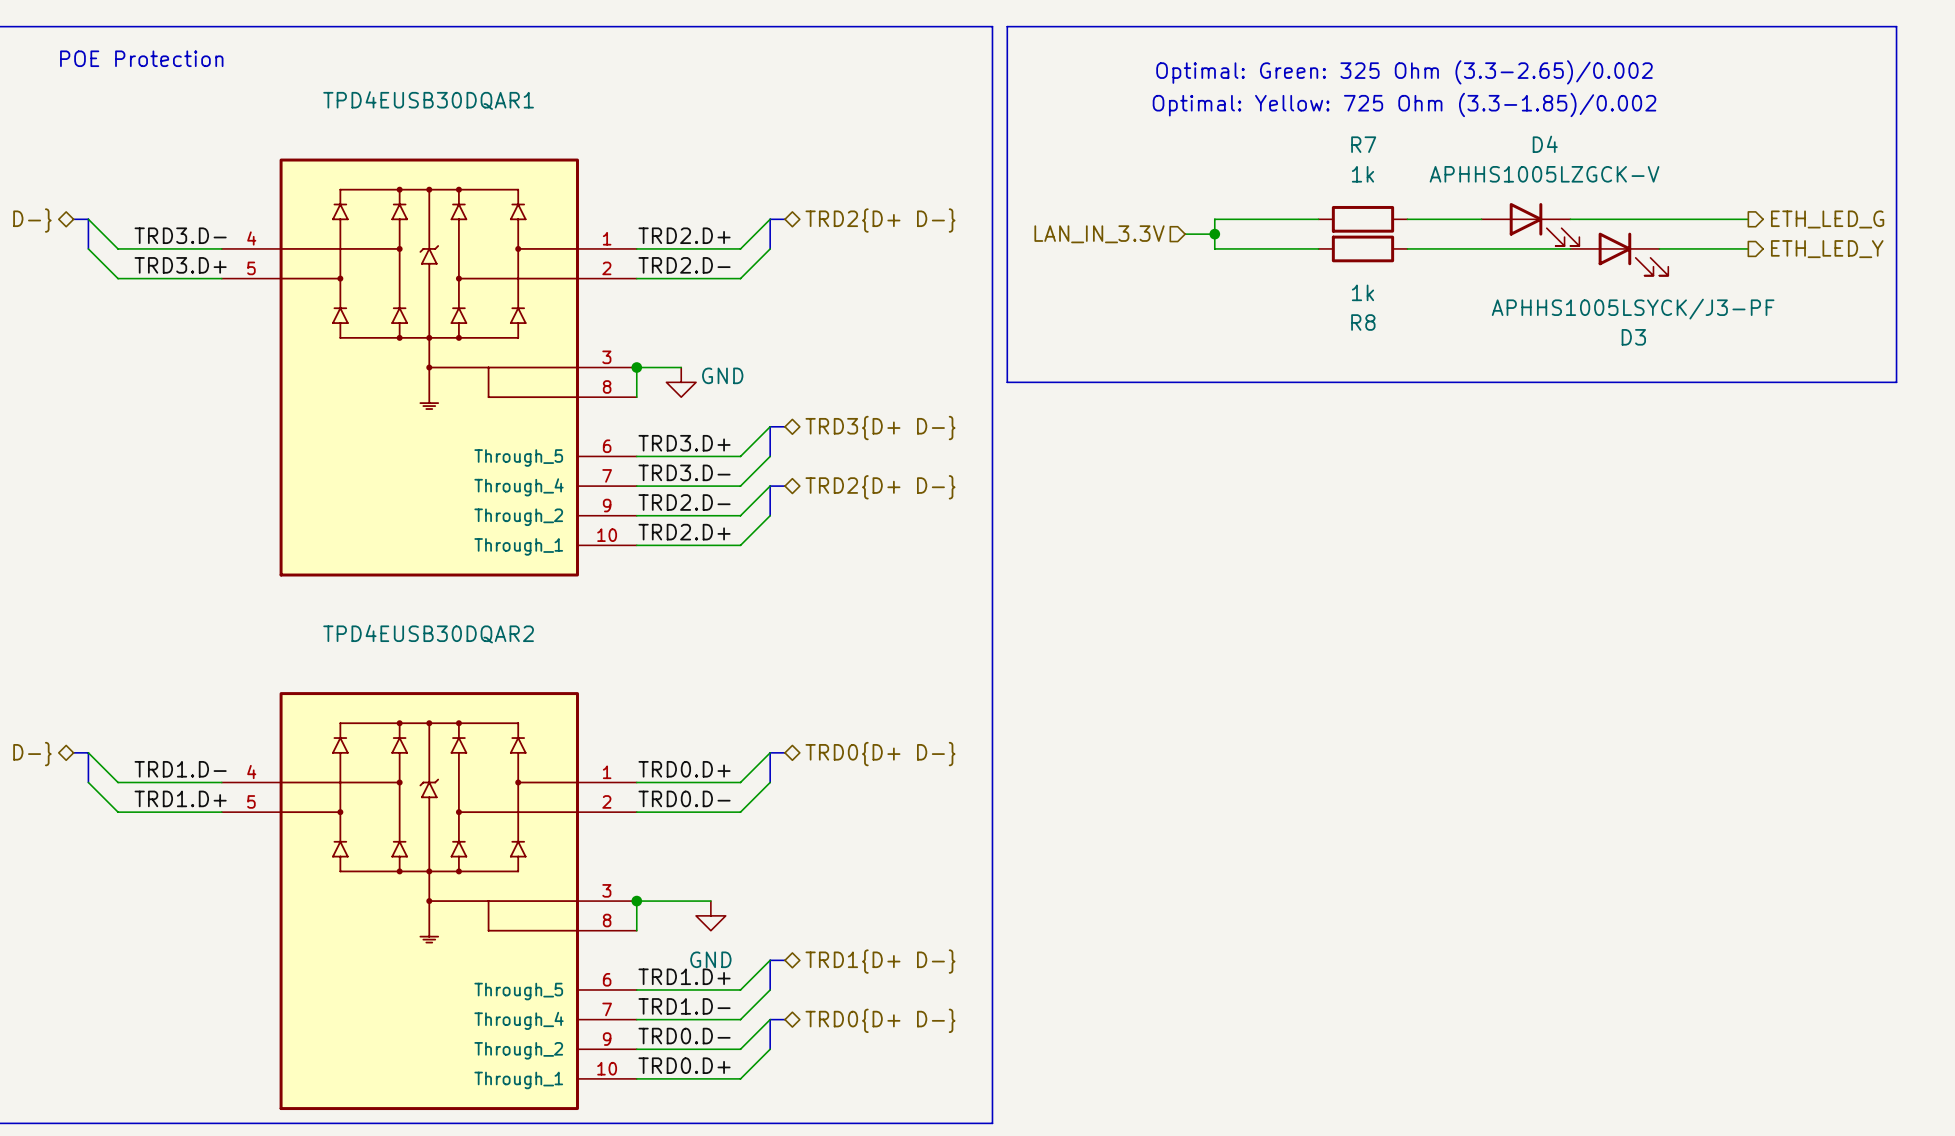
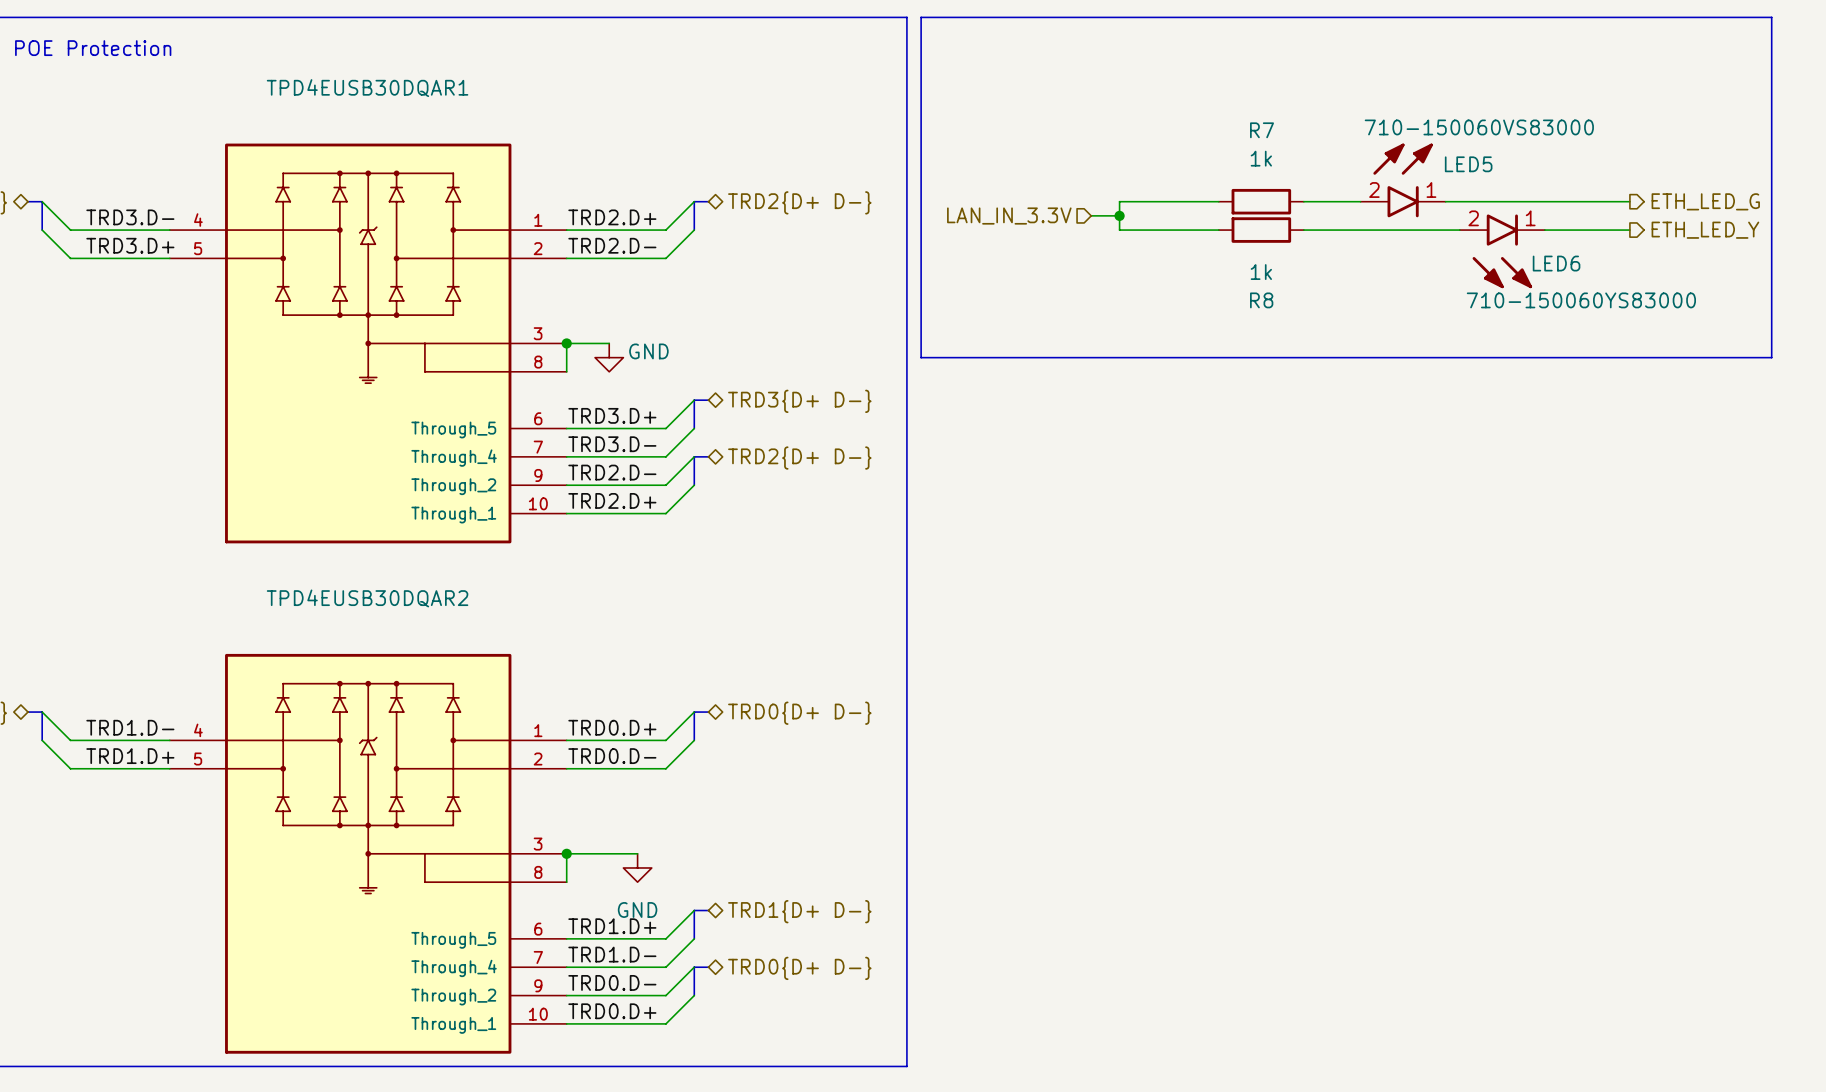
text: Optimal: Green: 325 Ohm (3.3-2.65)/0.002 (1404, 72) -> none
text: Optimal: Yellow: 725 Ohm (3.3-1.85)/0.002 (1404, 104) -> none
LED5: none -> 710-150060VS83000 (1403, 180)
D4: APHHS1005LZGCK-V (1530, 224) -> none
D3: APHHS1005LSYCK/J3-PF (1619, 254) -> none
LED6: none -> 710-150060YS83000 (1502, 251)

